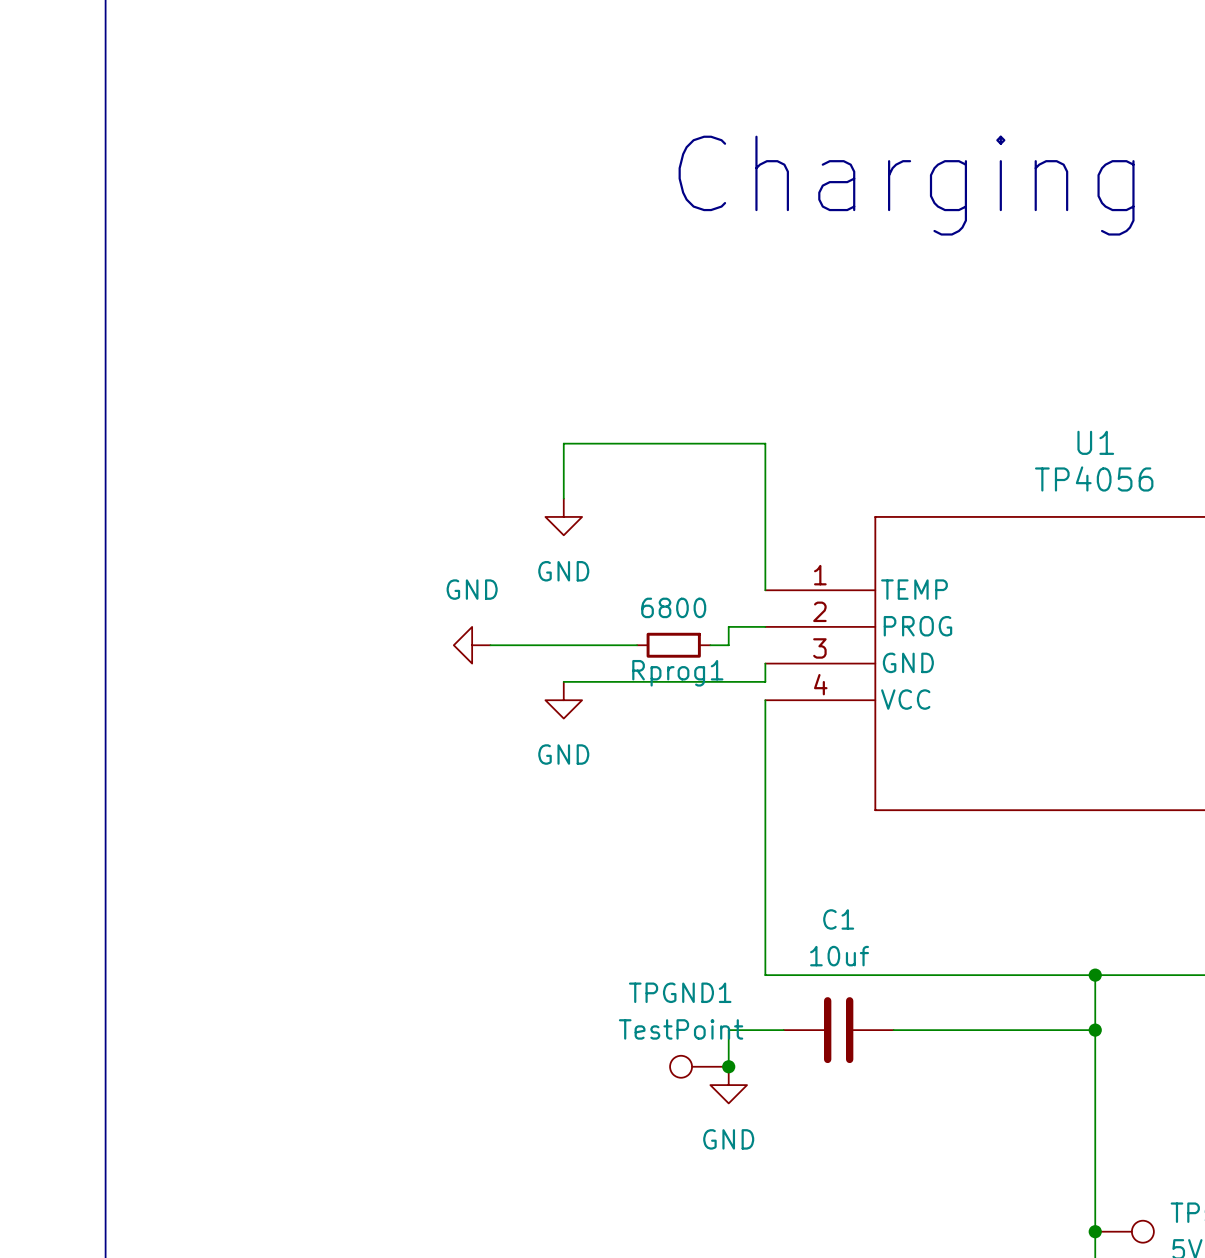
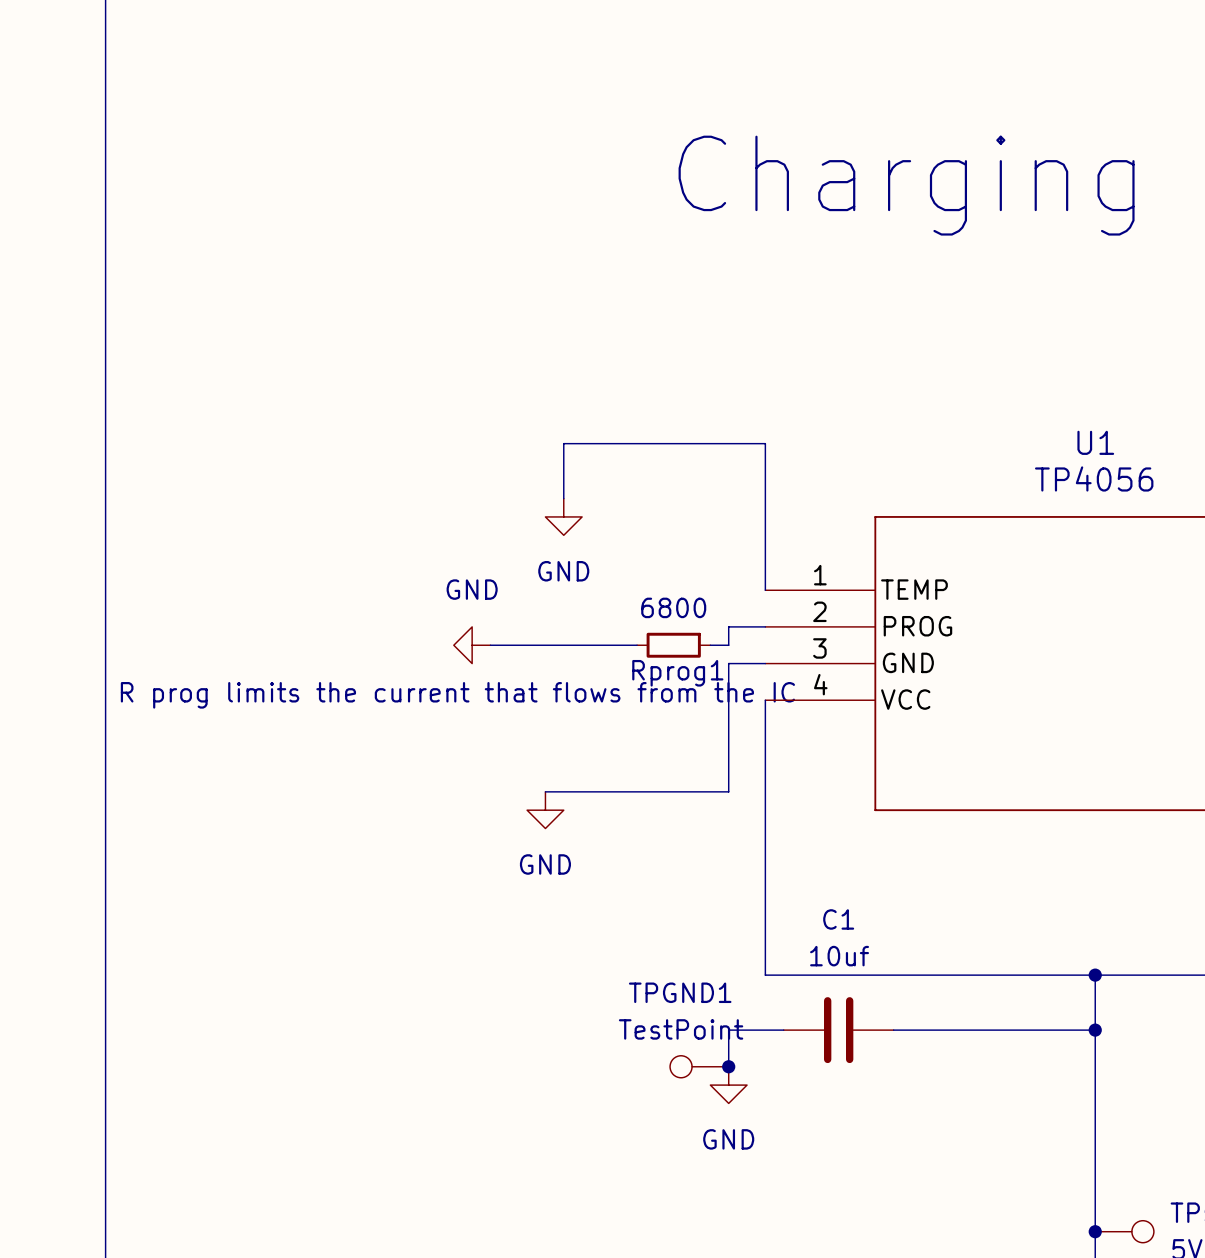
wire: (765, 663) (765, 681) (563, 681) -> (765, 663) (728, 663) (728, 791) (545, 791)
text: none -> R prog limits the current that flows from the IC (457, 695)
power symbol position: GND (563, 700) -> GND (545, 810)

